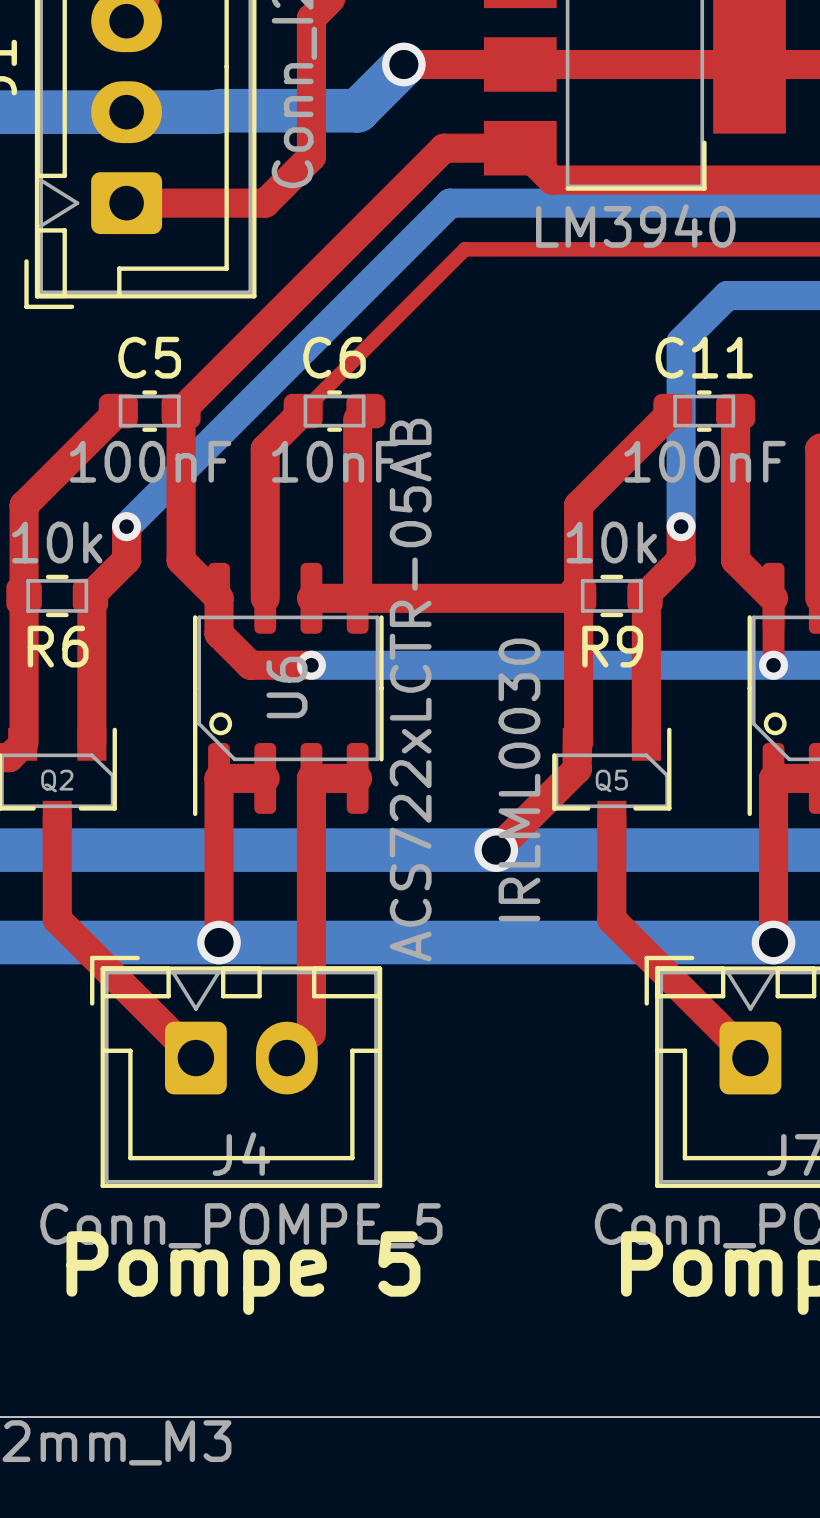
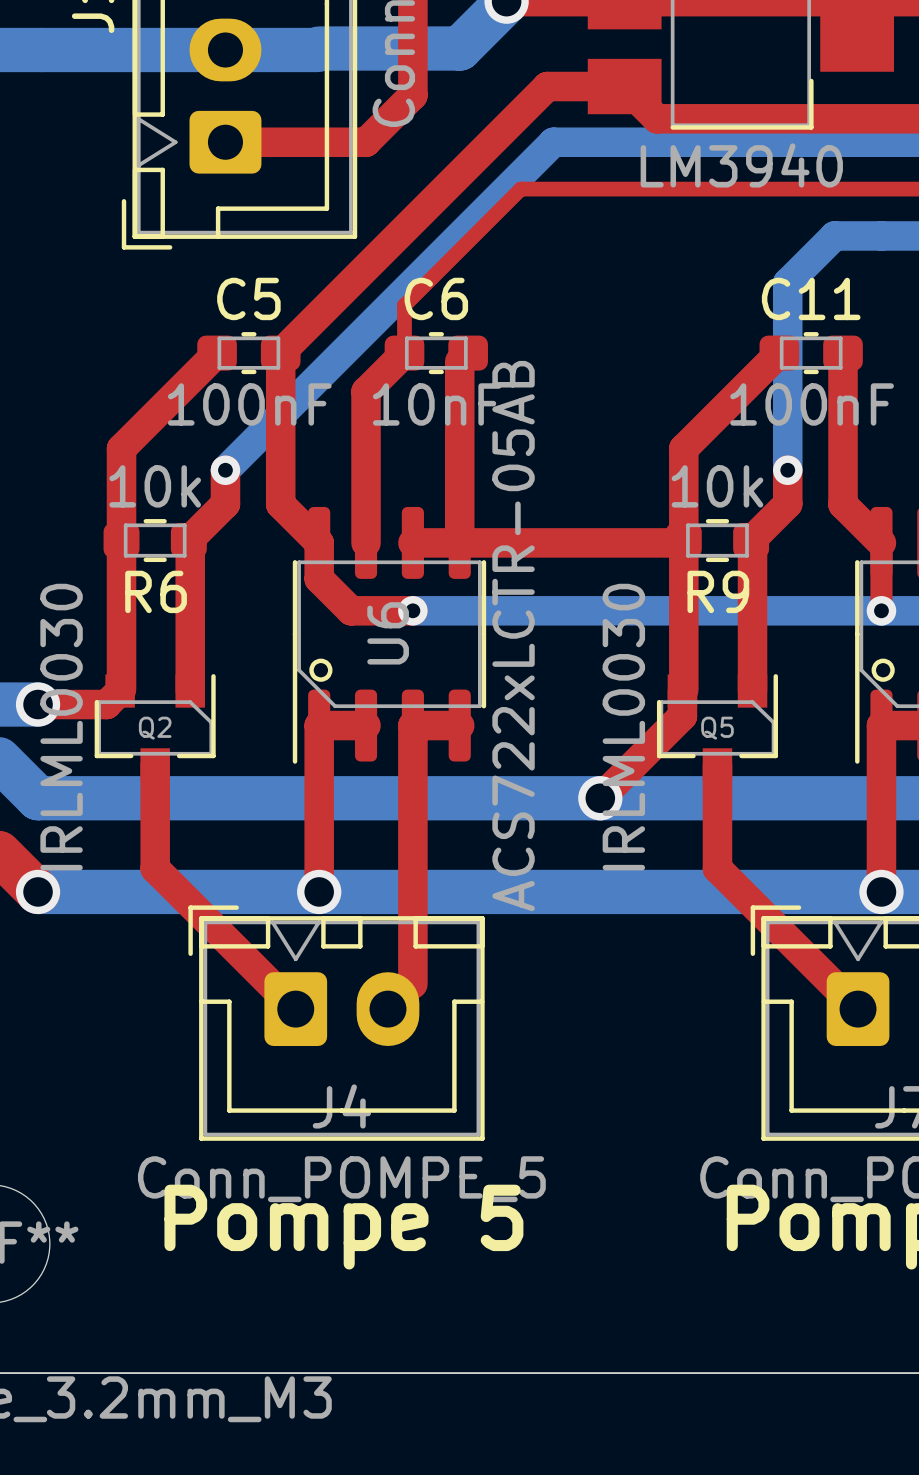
top track: (464, 249) (303, 411) -> (568, 189) (520, 189) (404, 305) (404, 353)

